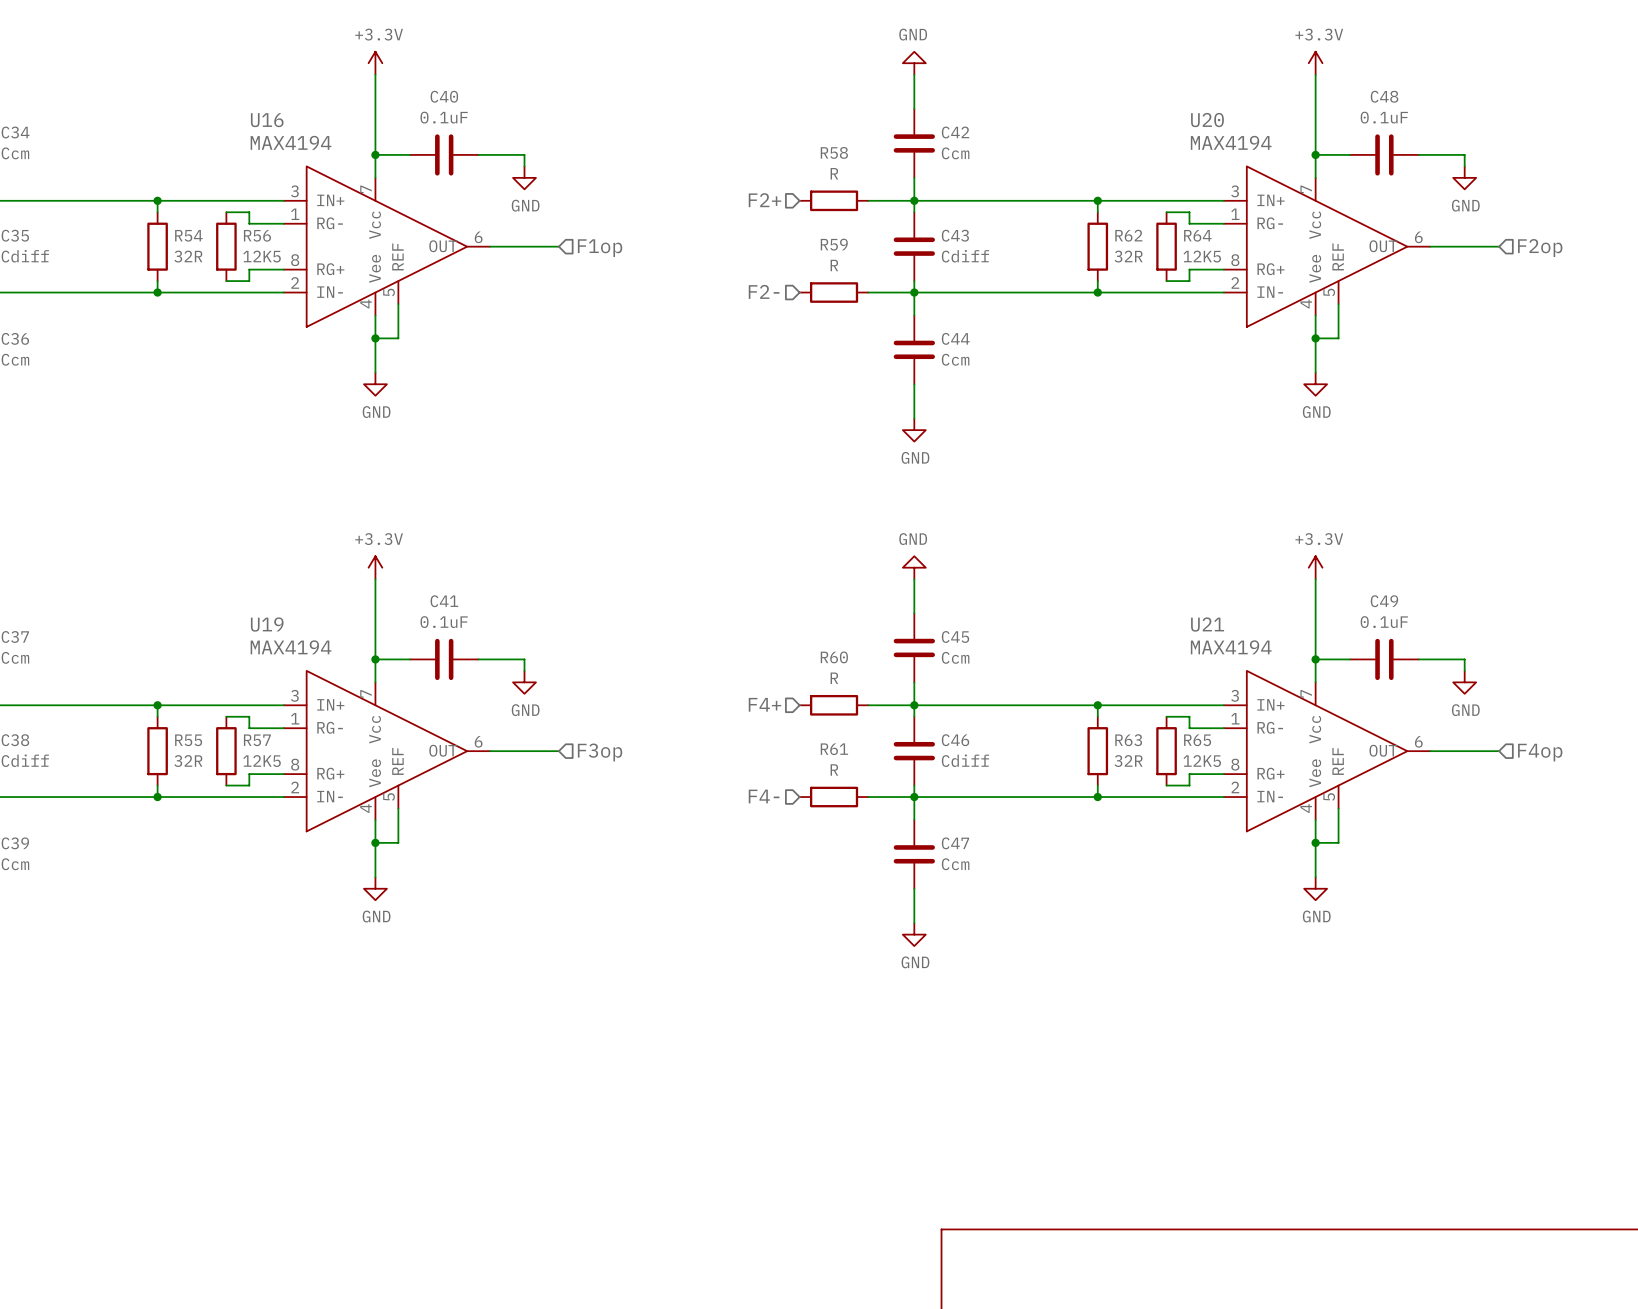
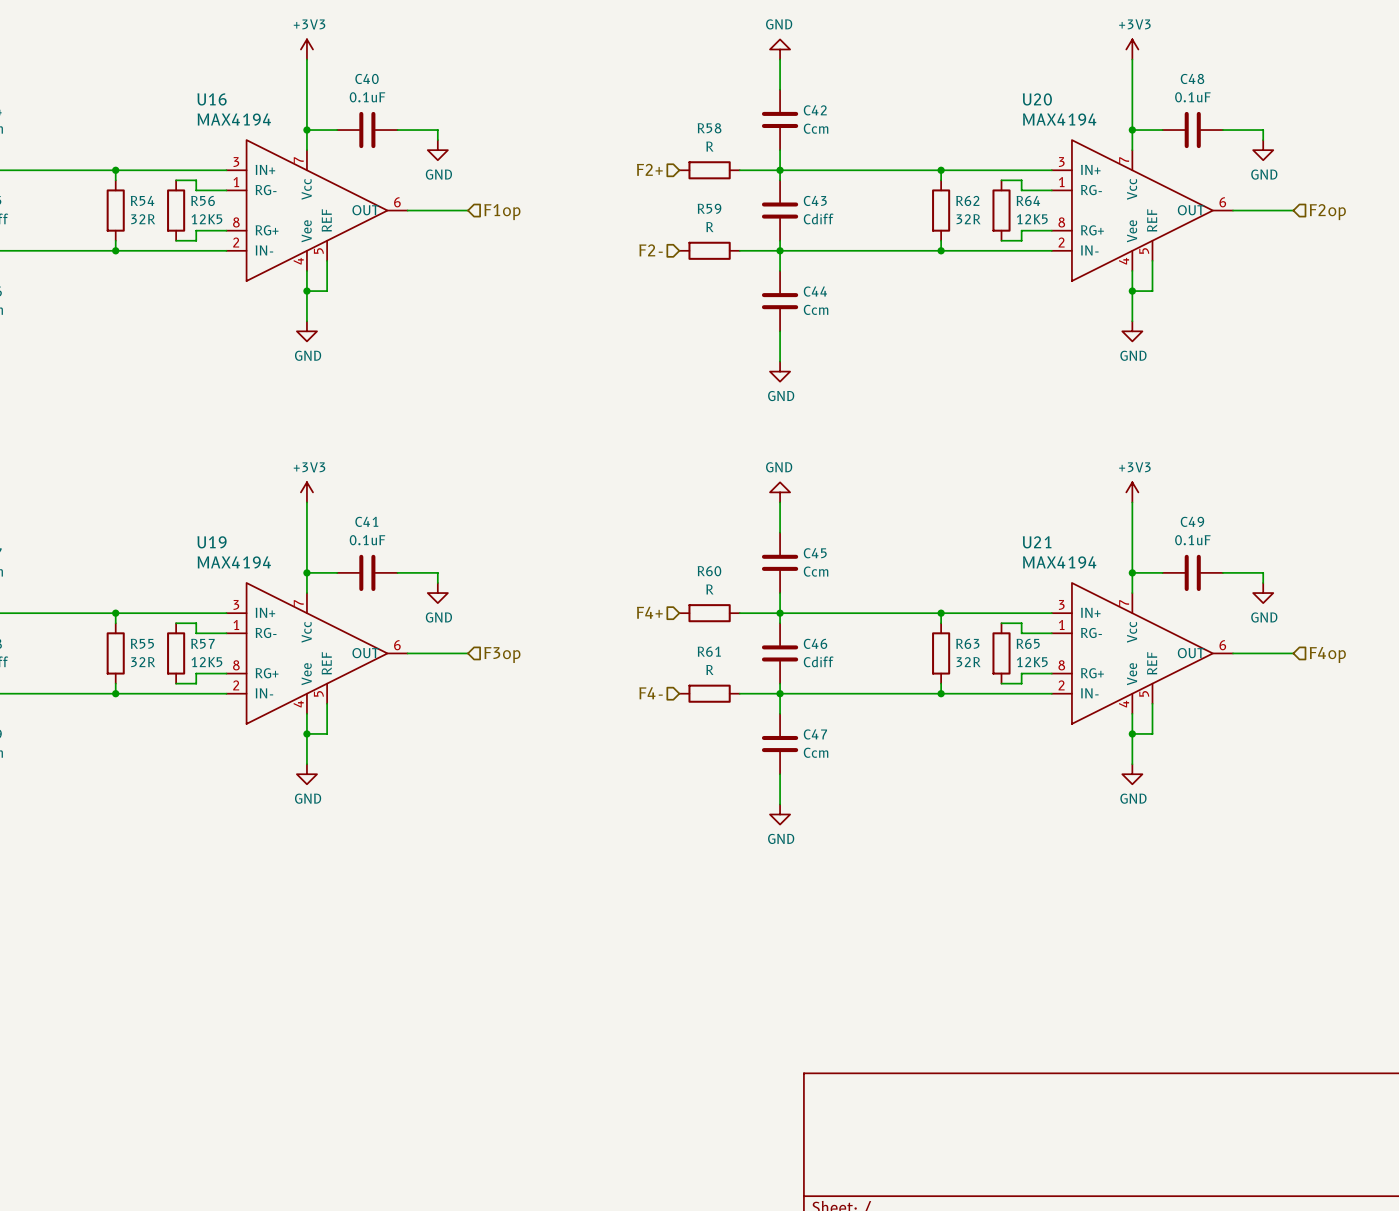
power symbol: +3.3V (375, 63) -> +3V3 (306, 49)
power symbol: +3.3V (1315, 63) -> +3V3 (1132, 49)
power symbol: +3.3V (375, 567) -> +3V3 (306, 492)
power symbol: +3.3V (1315, 567) -> +3V3 (1132, 492)

